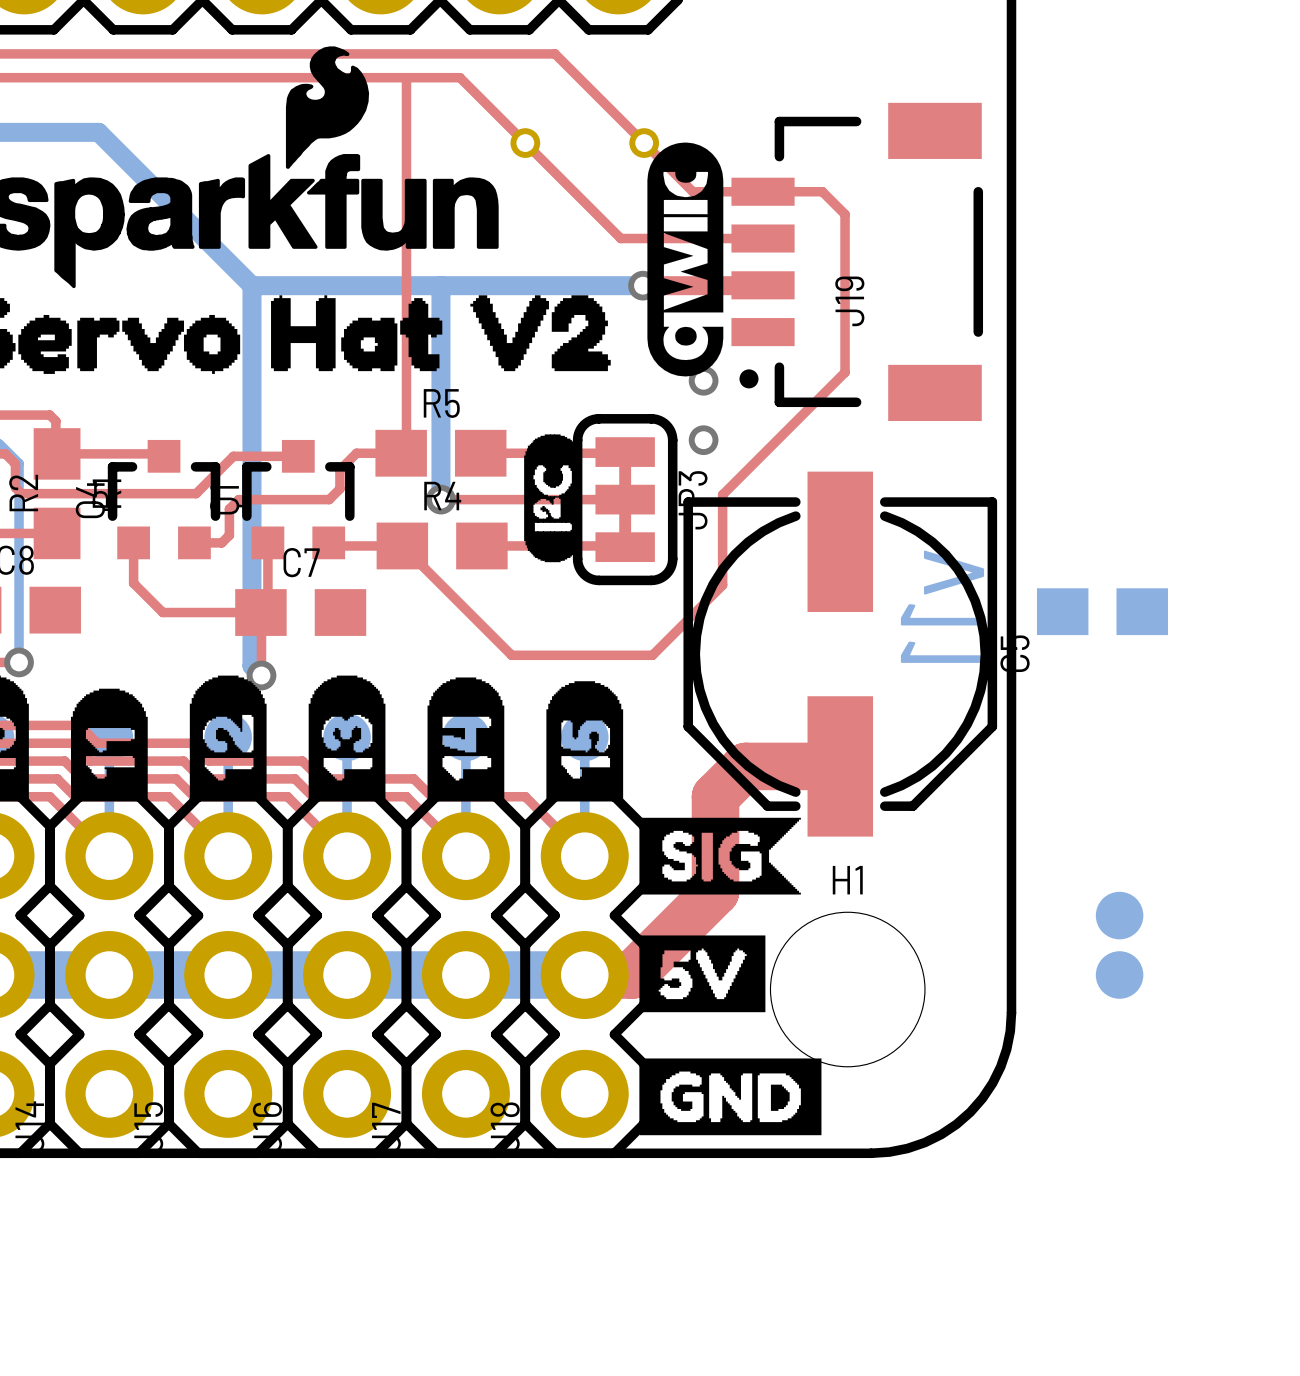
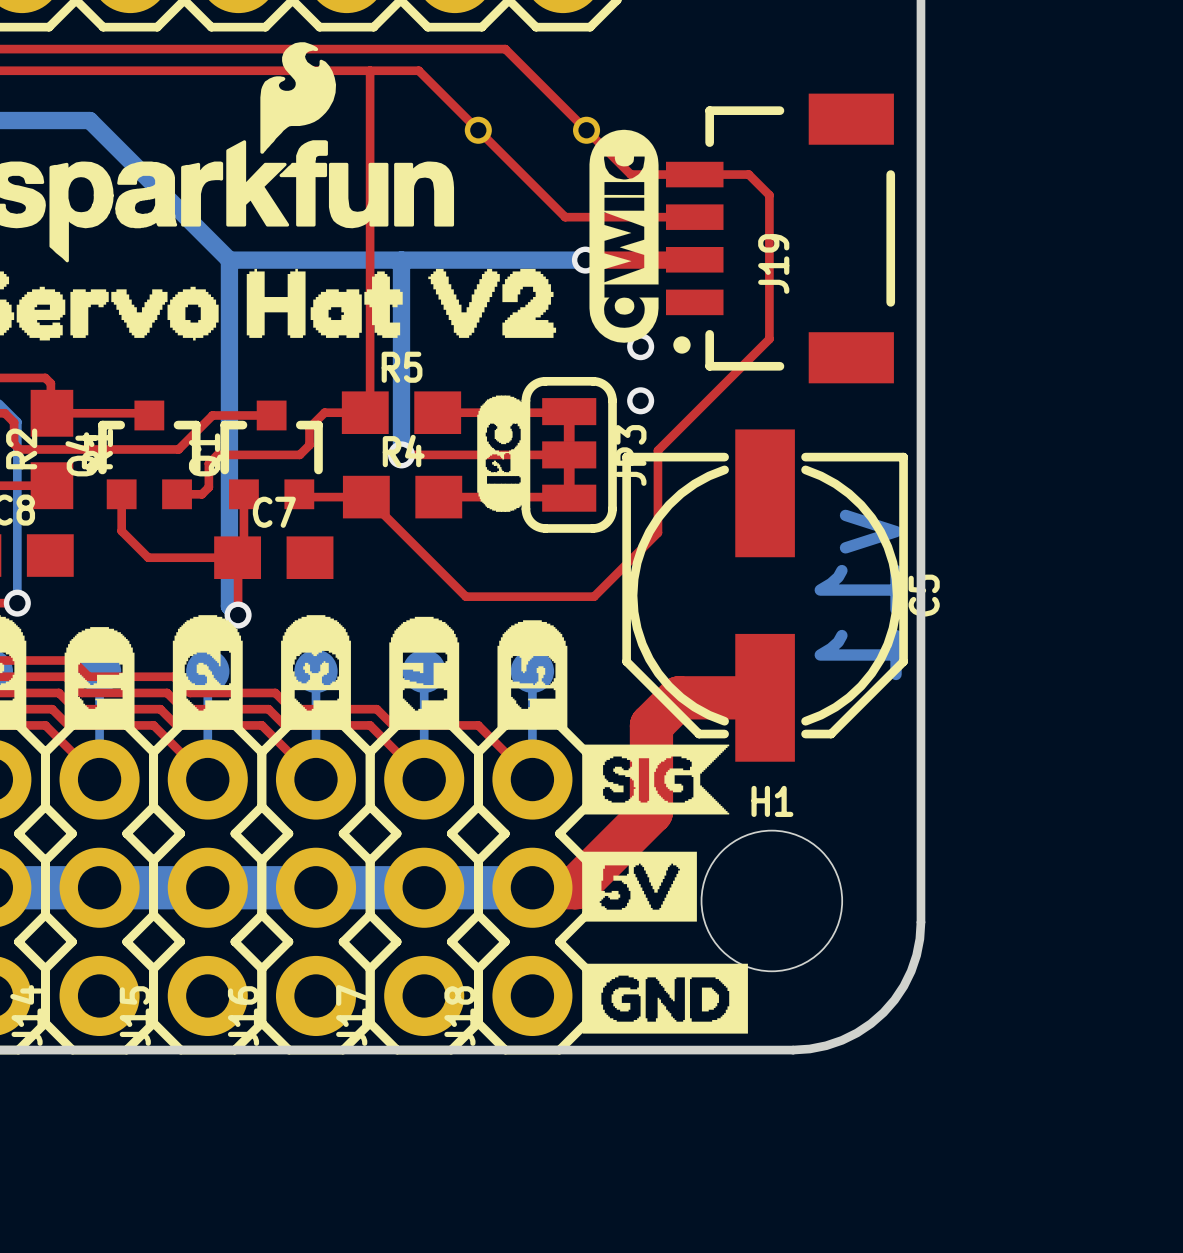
part: (1102, 611) -> none
part: (1119, 915) -> none
part: (1119, 975) -> none

